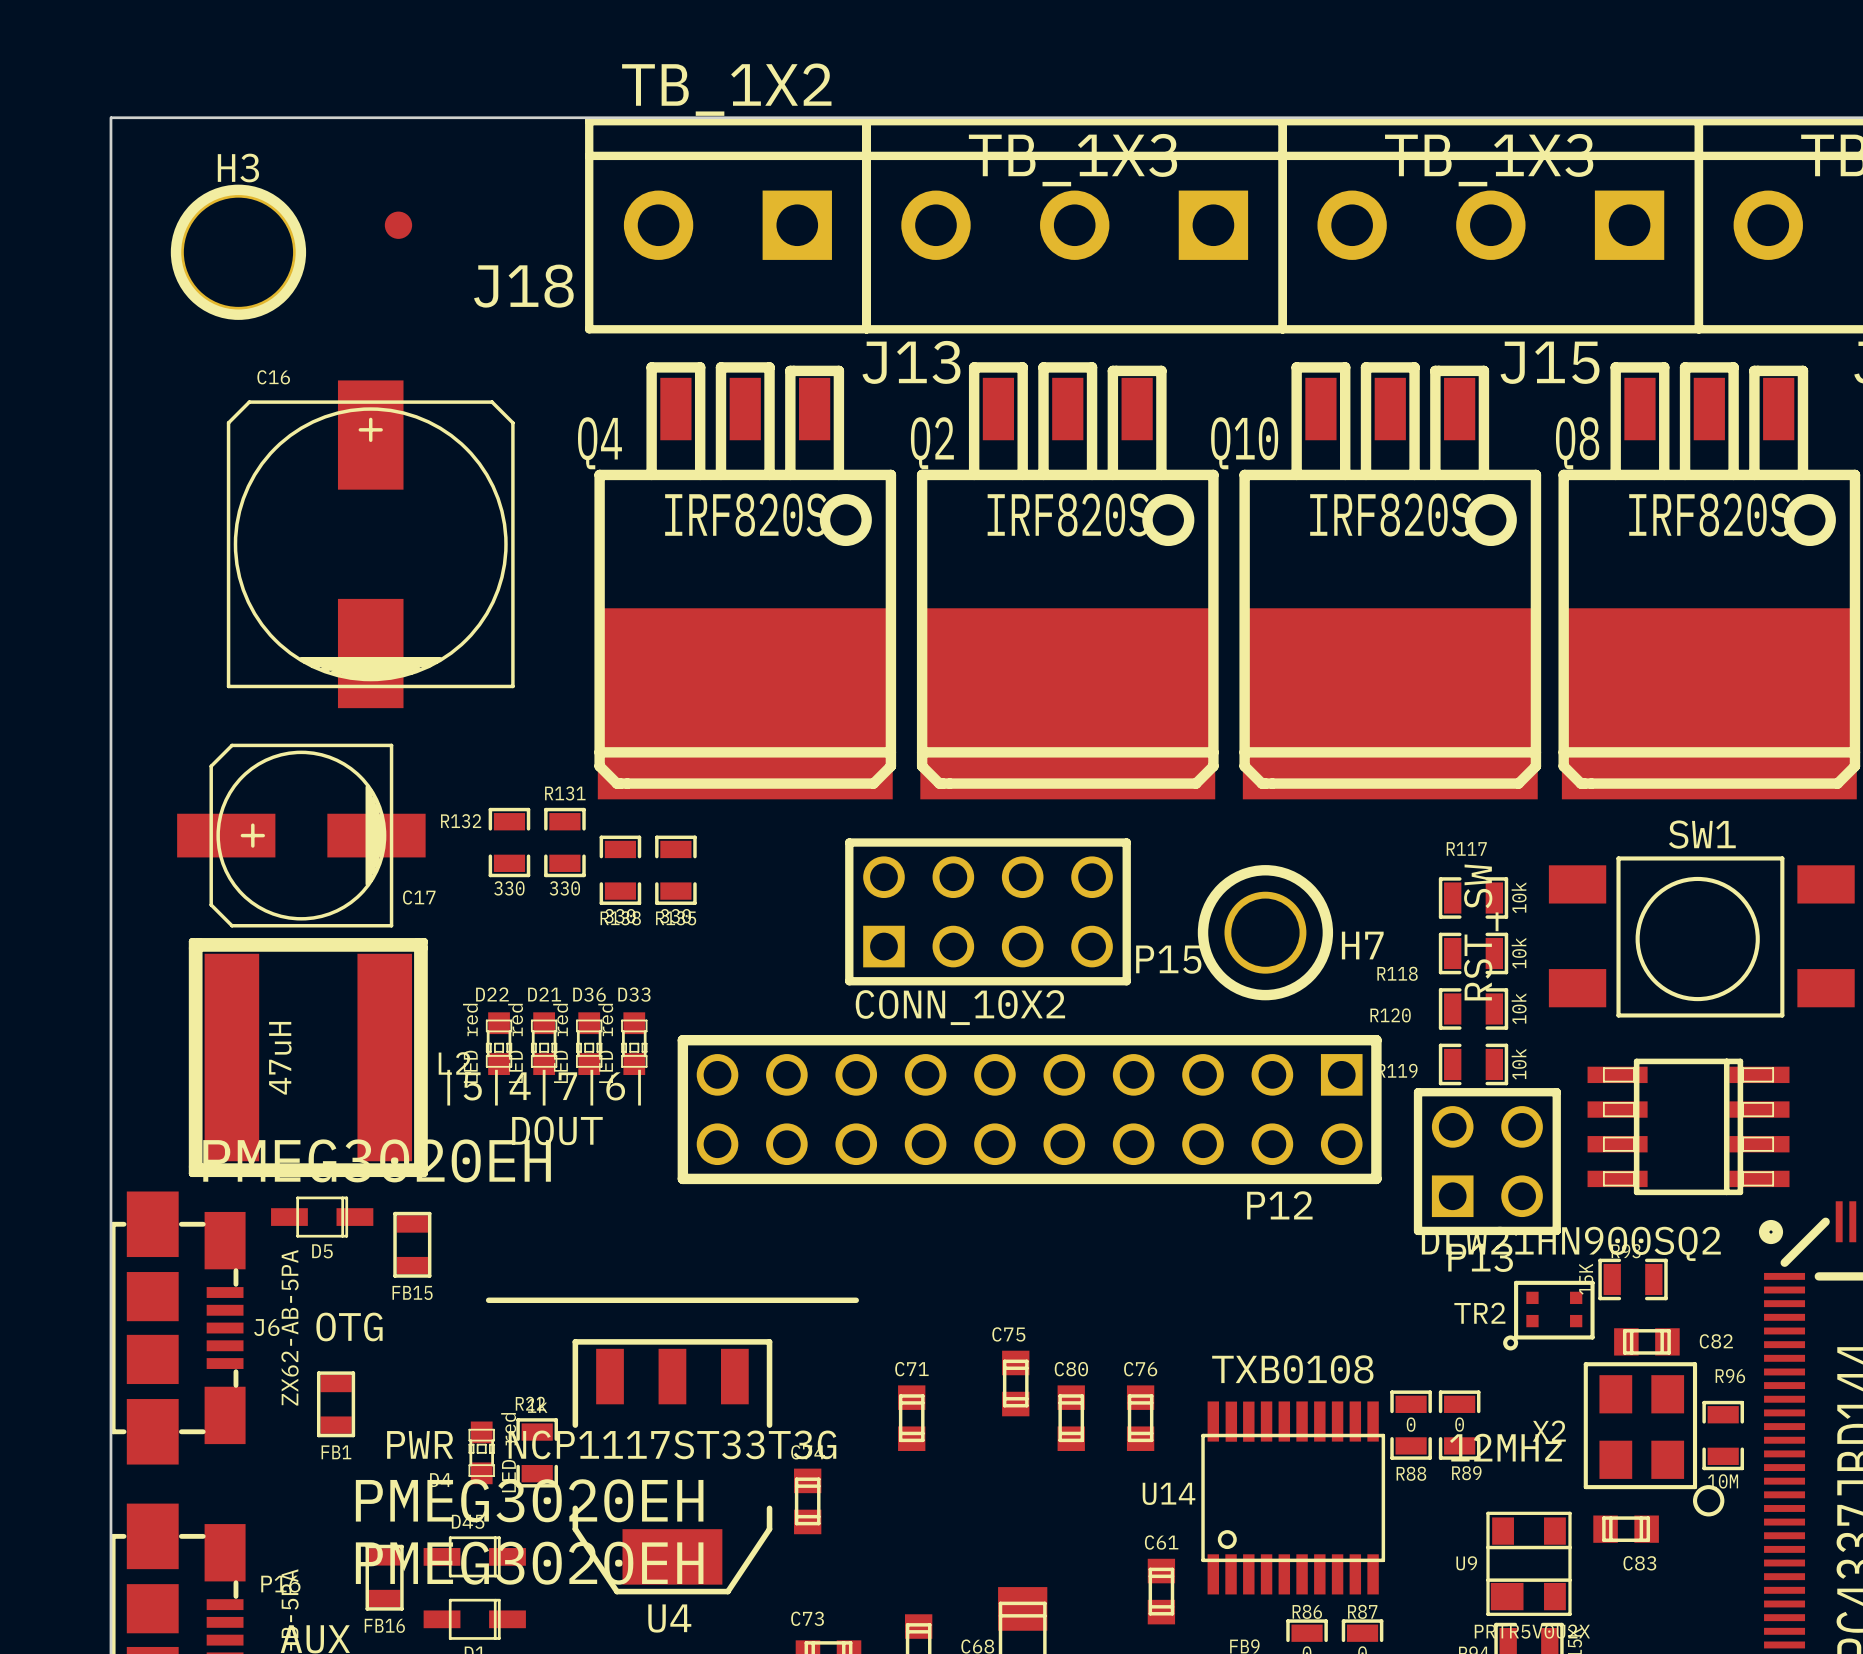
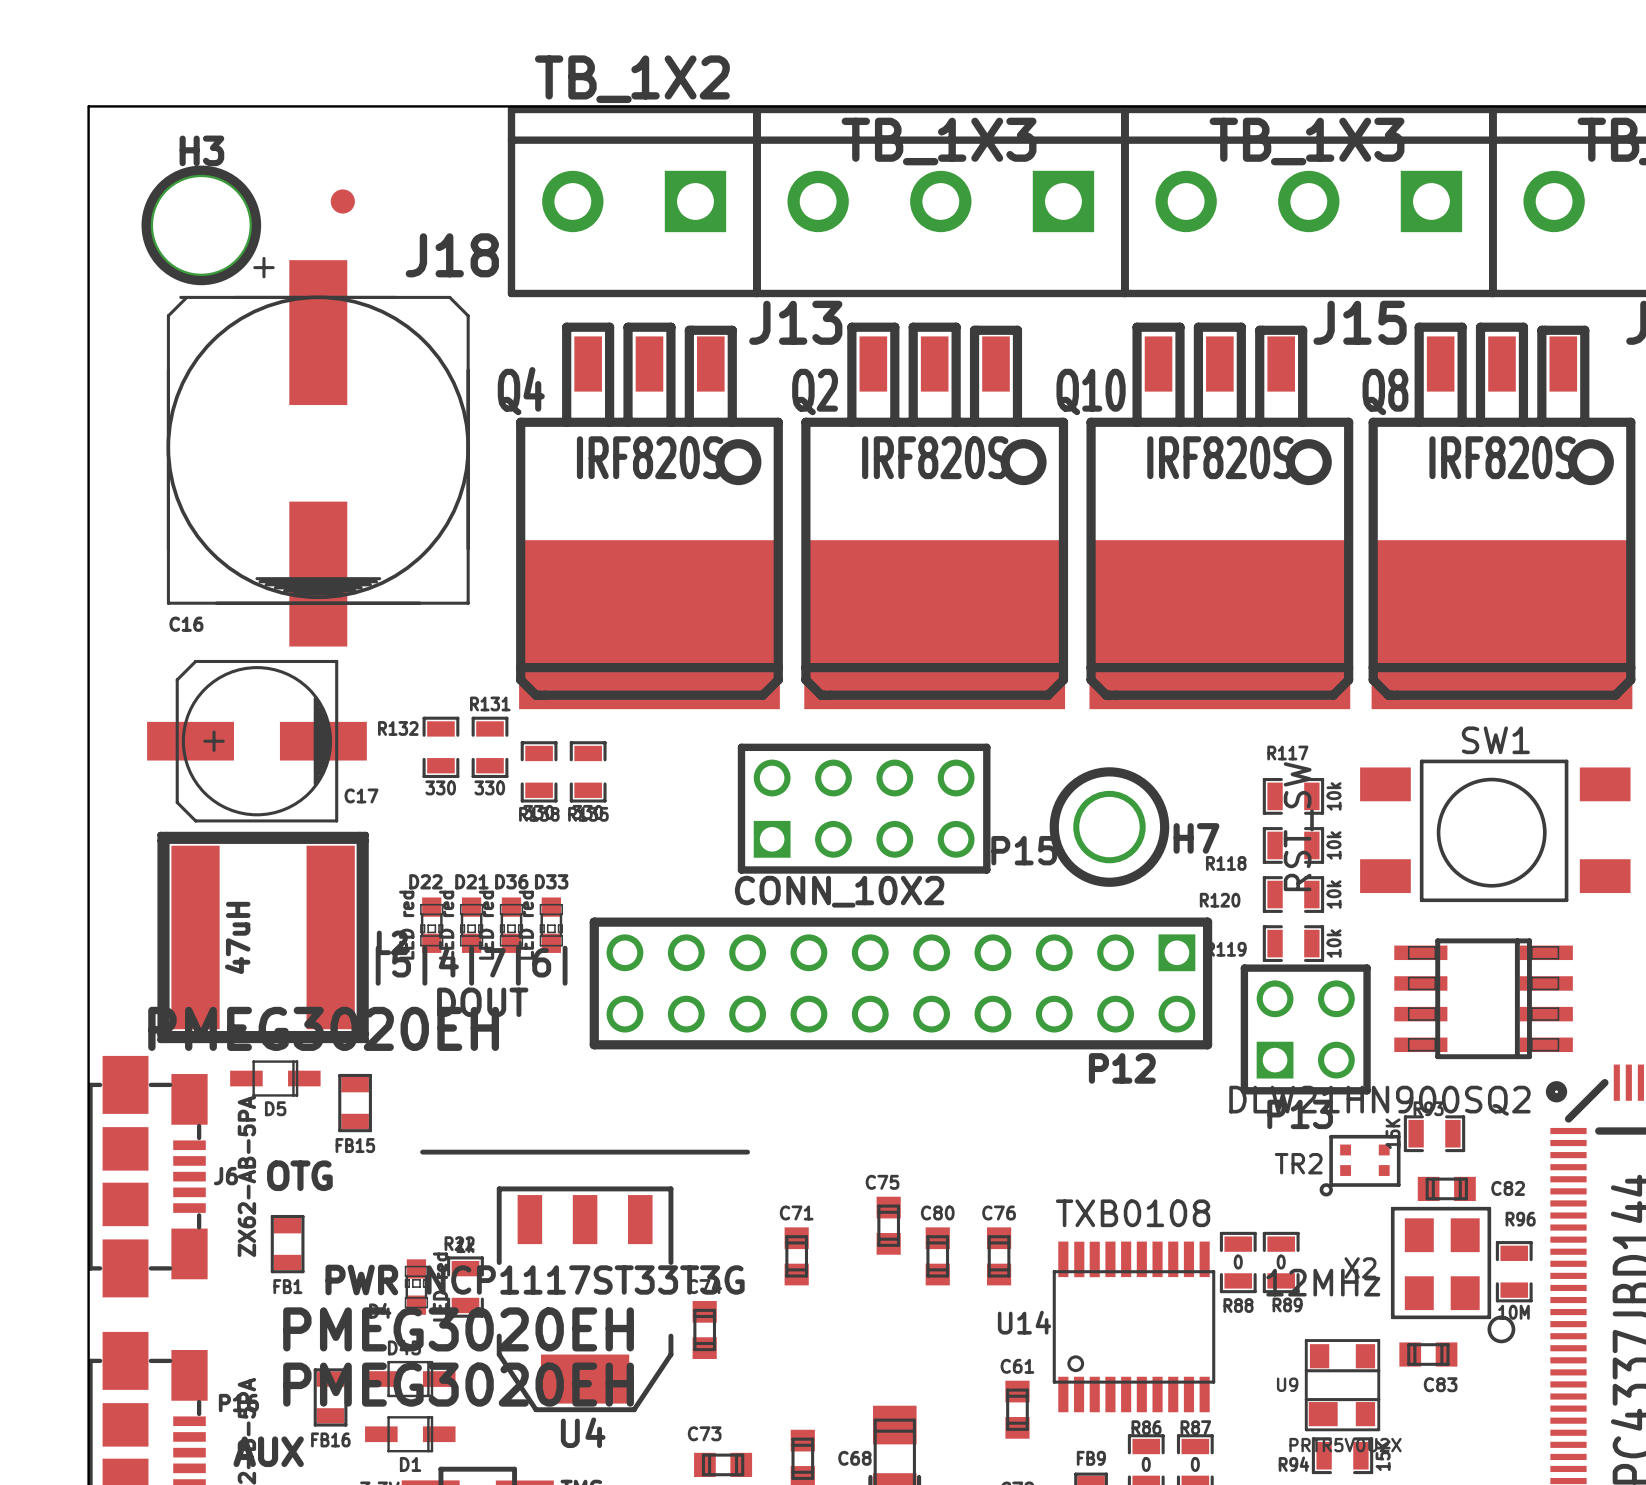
C16 name position: C16 (273, 377) -> C16 (186, 624)
C16 footprint: [226, 380, 515, 709] -> [166, 256, 471, 647]

